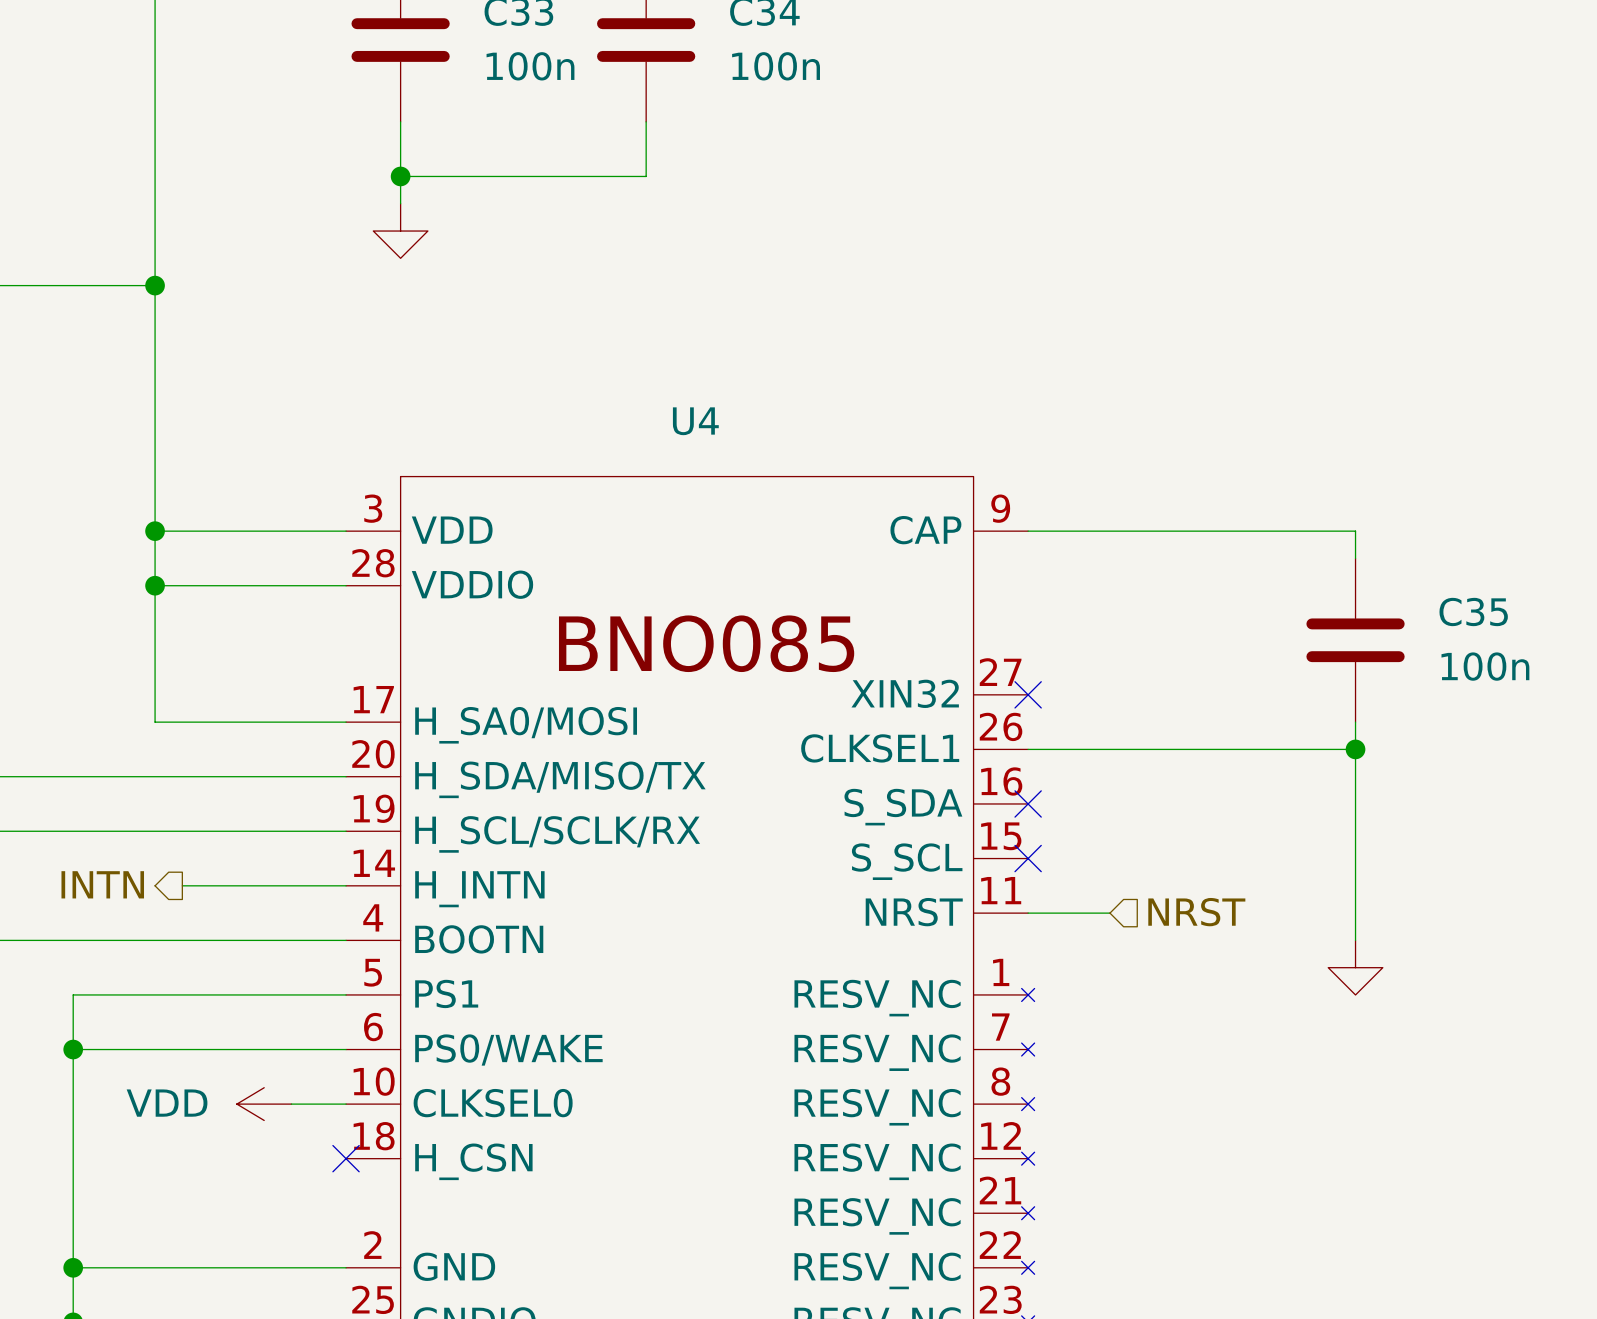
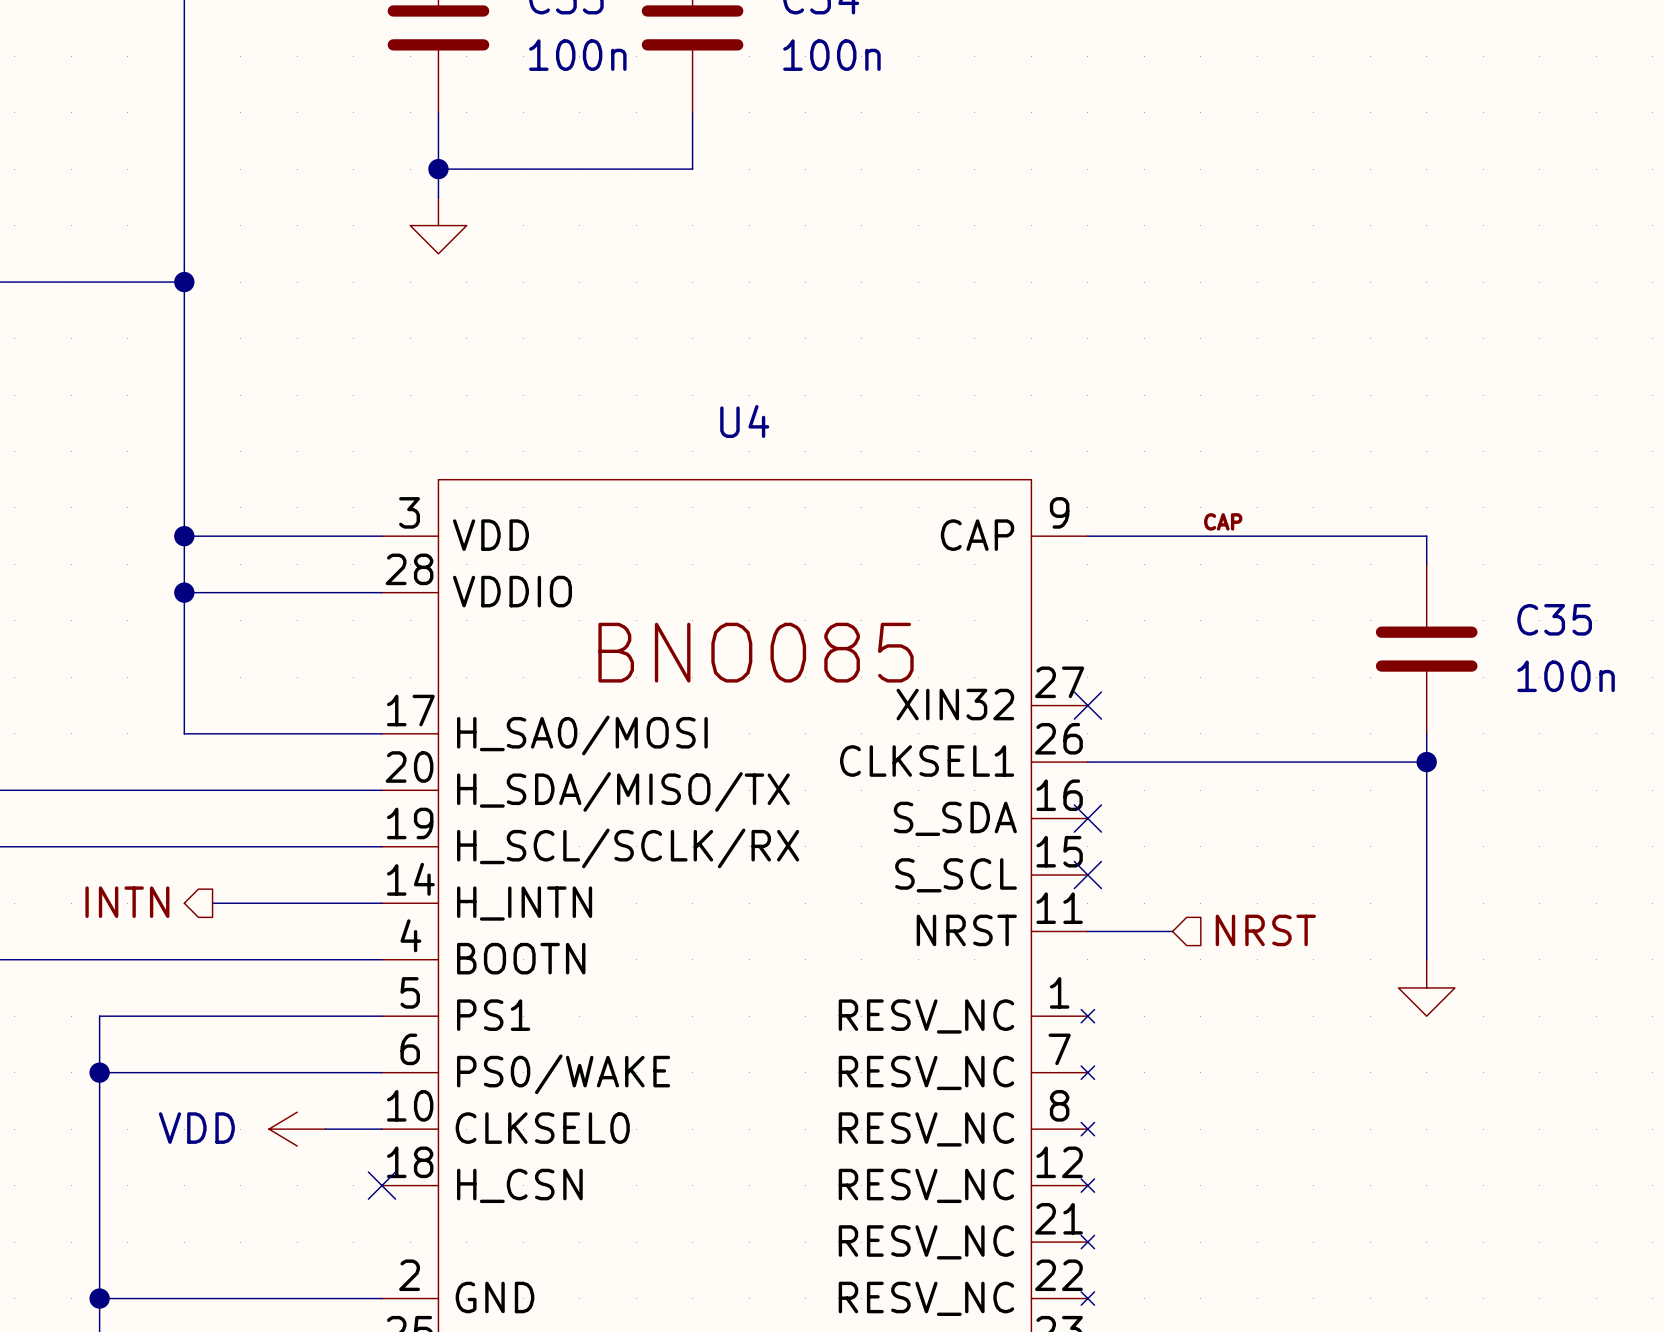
label: none -> CAP (1223, 521)

